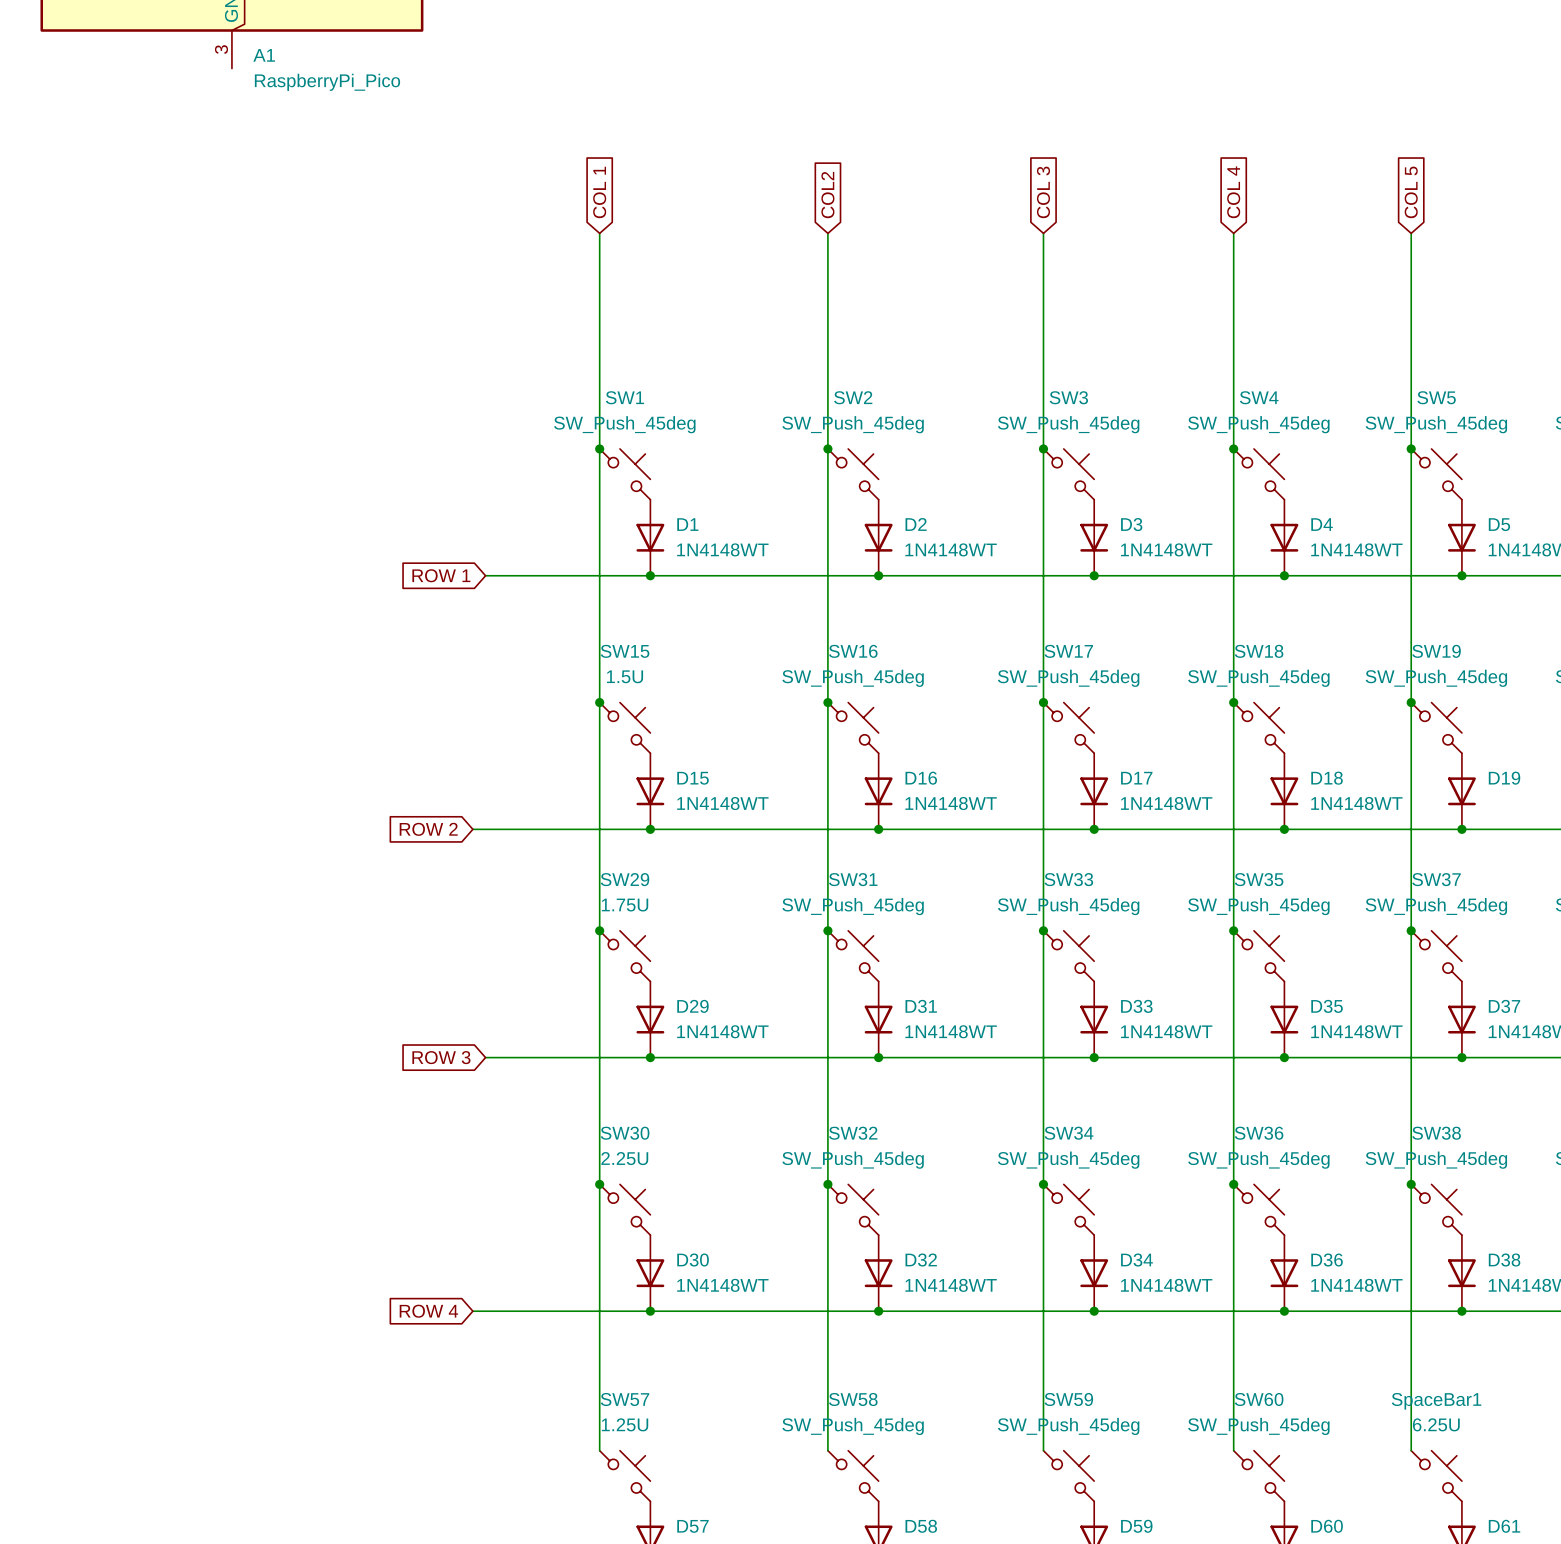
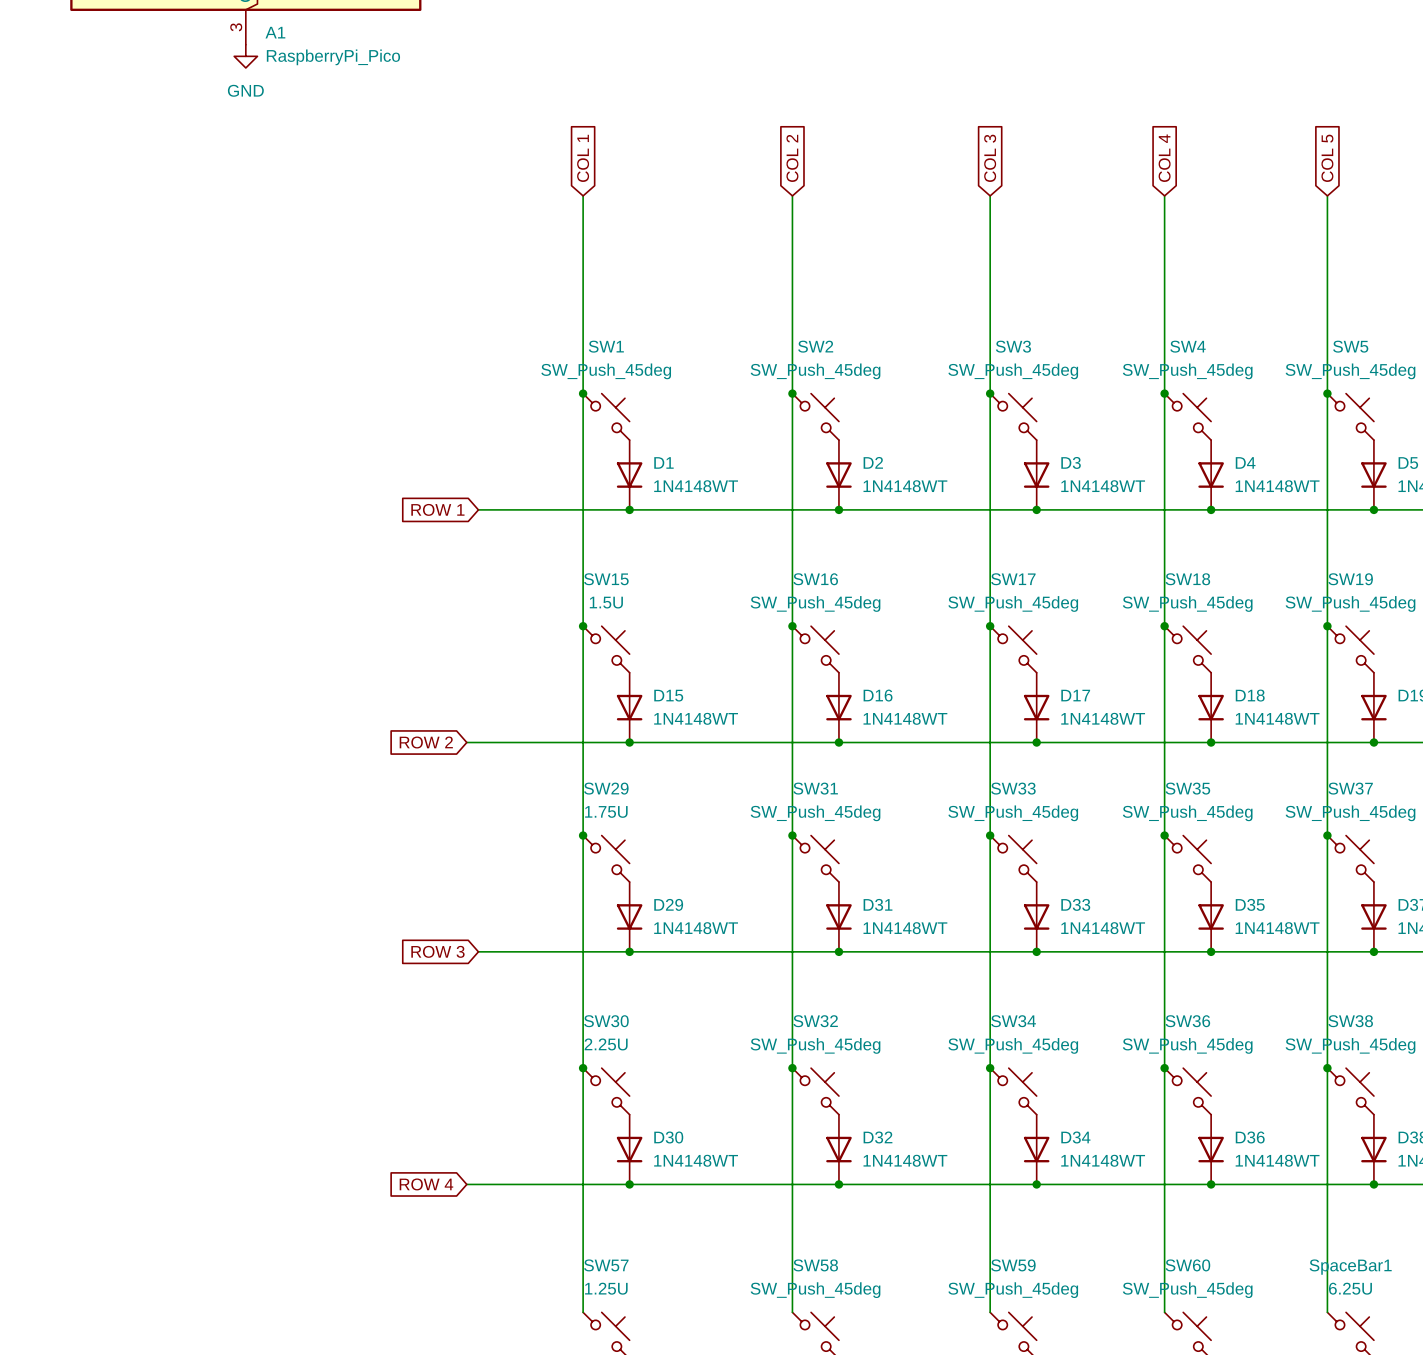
power symbol: none -> GND (245, 56)
global label: COL2 (827, 195) -> COL 2 (792, 158)

